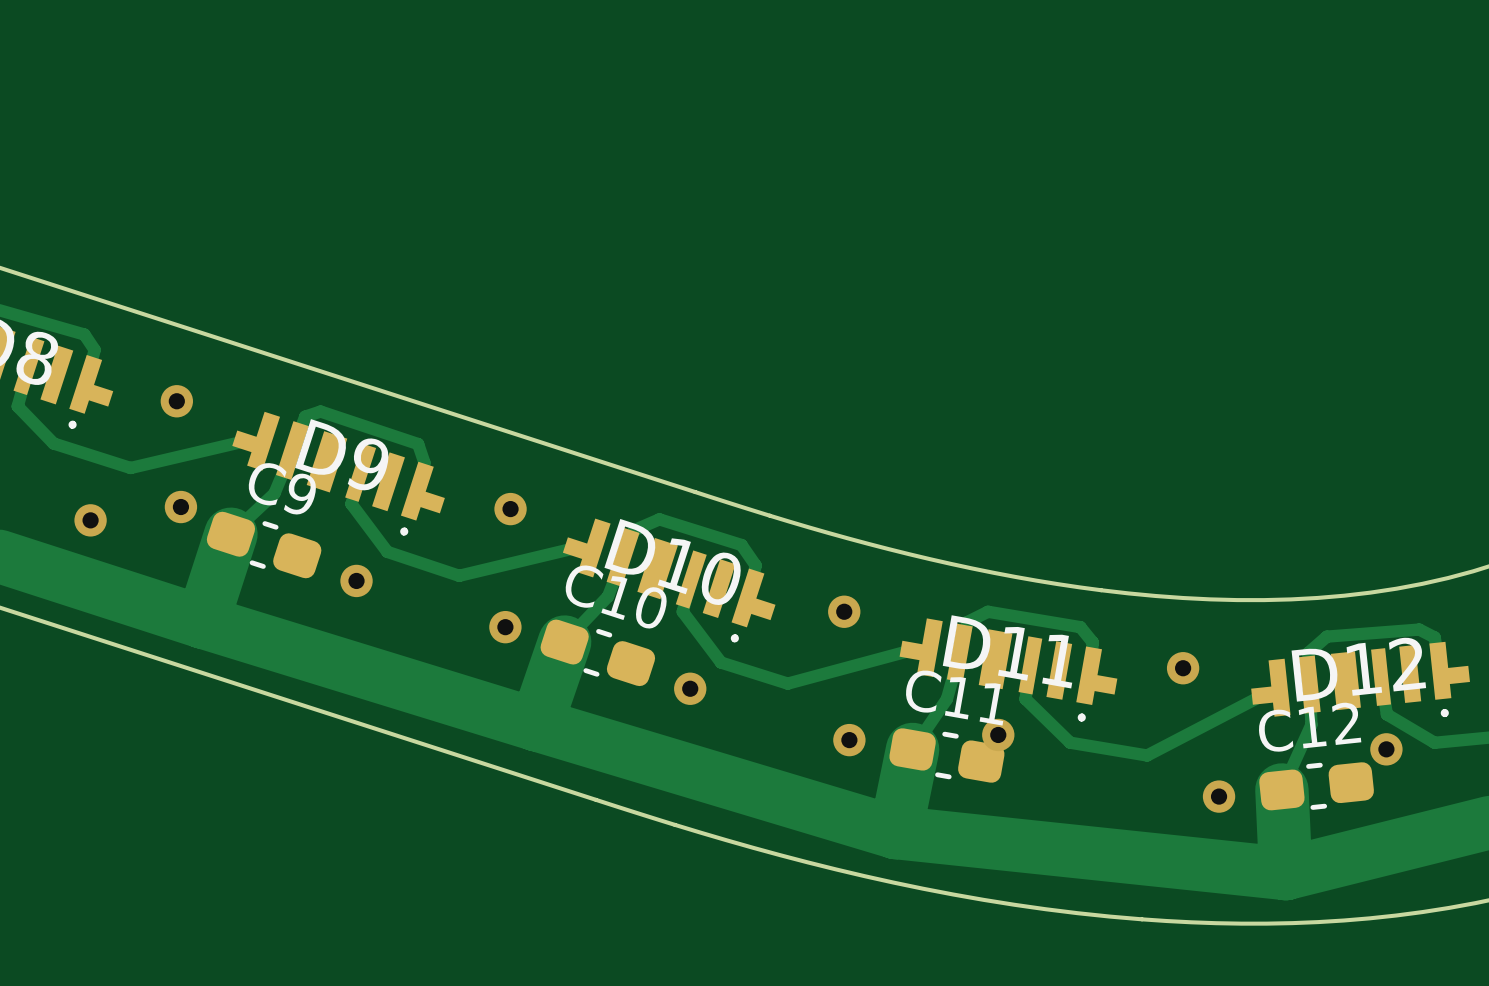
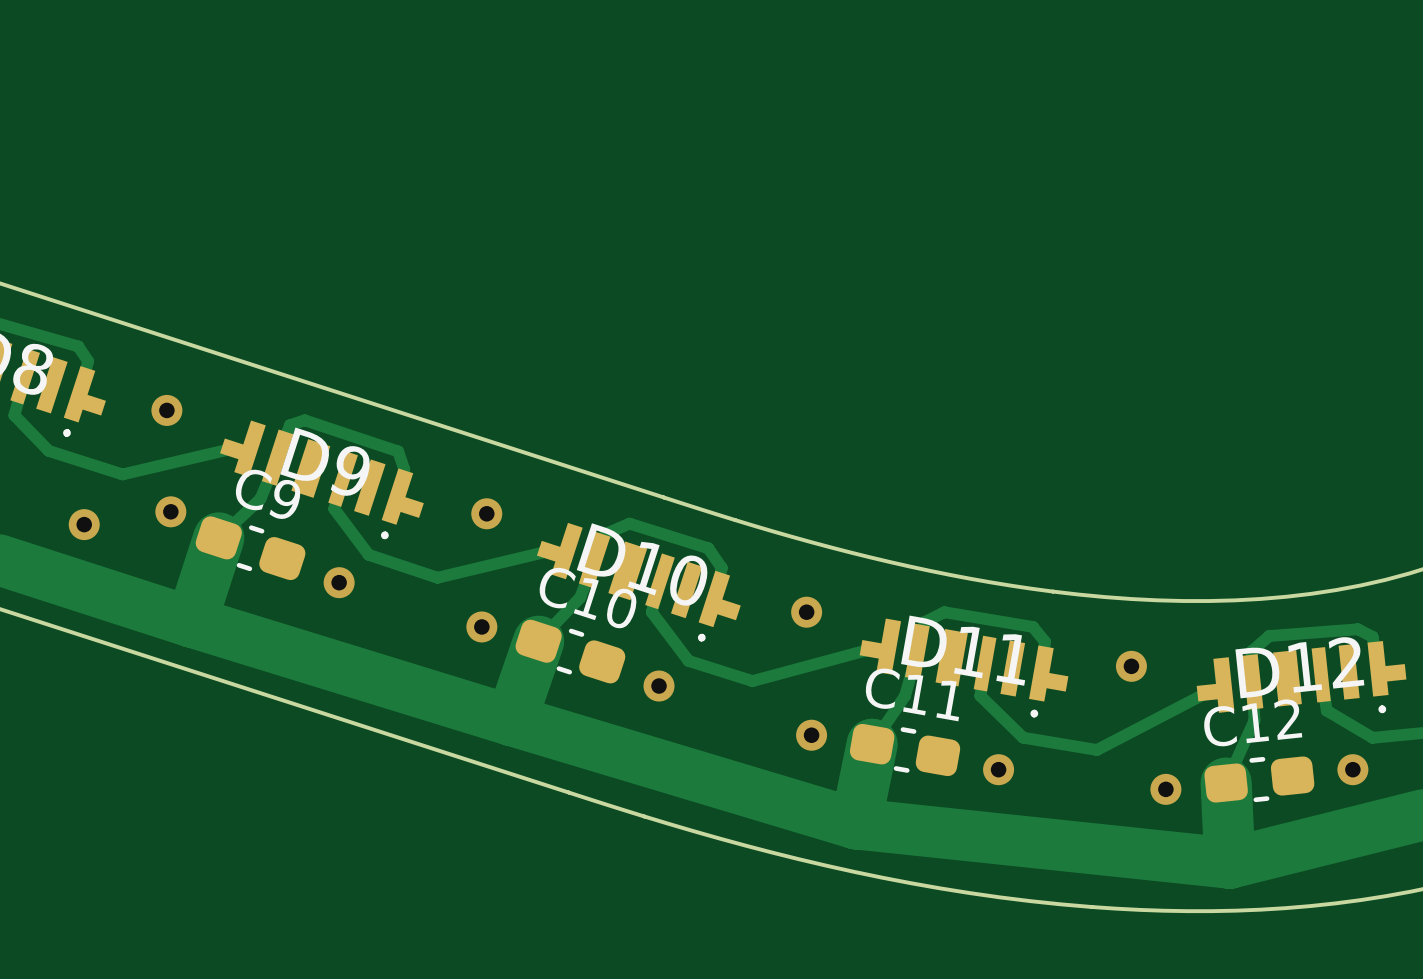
via position: (998, 734) -> (998, 769)
via position: (1386, 749) -> (1352, 769)

